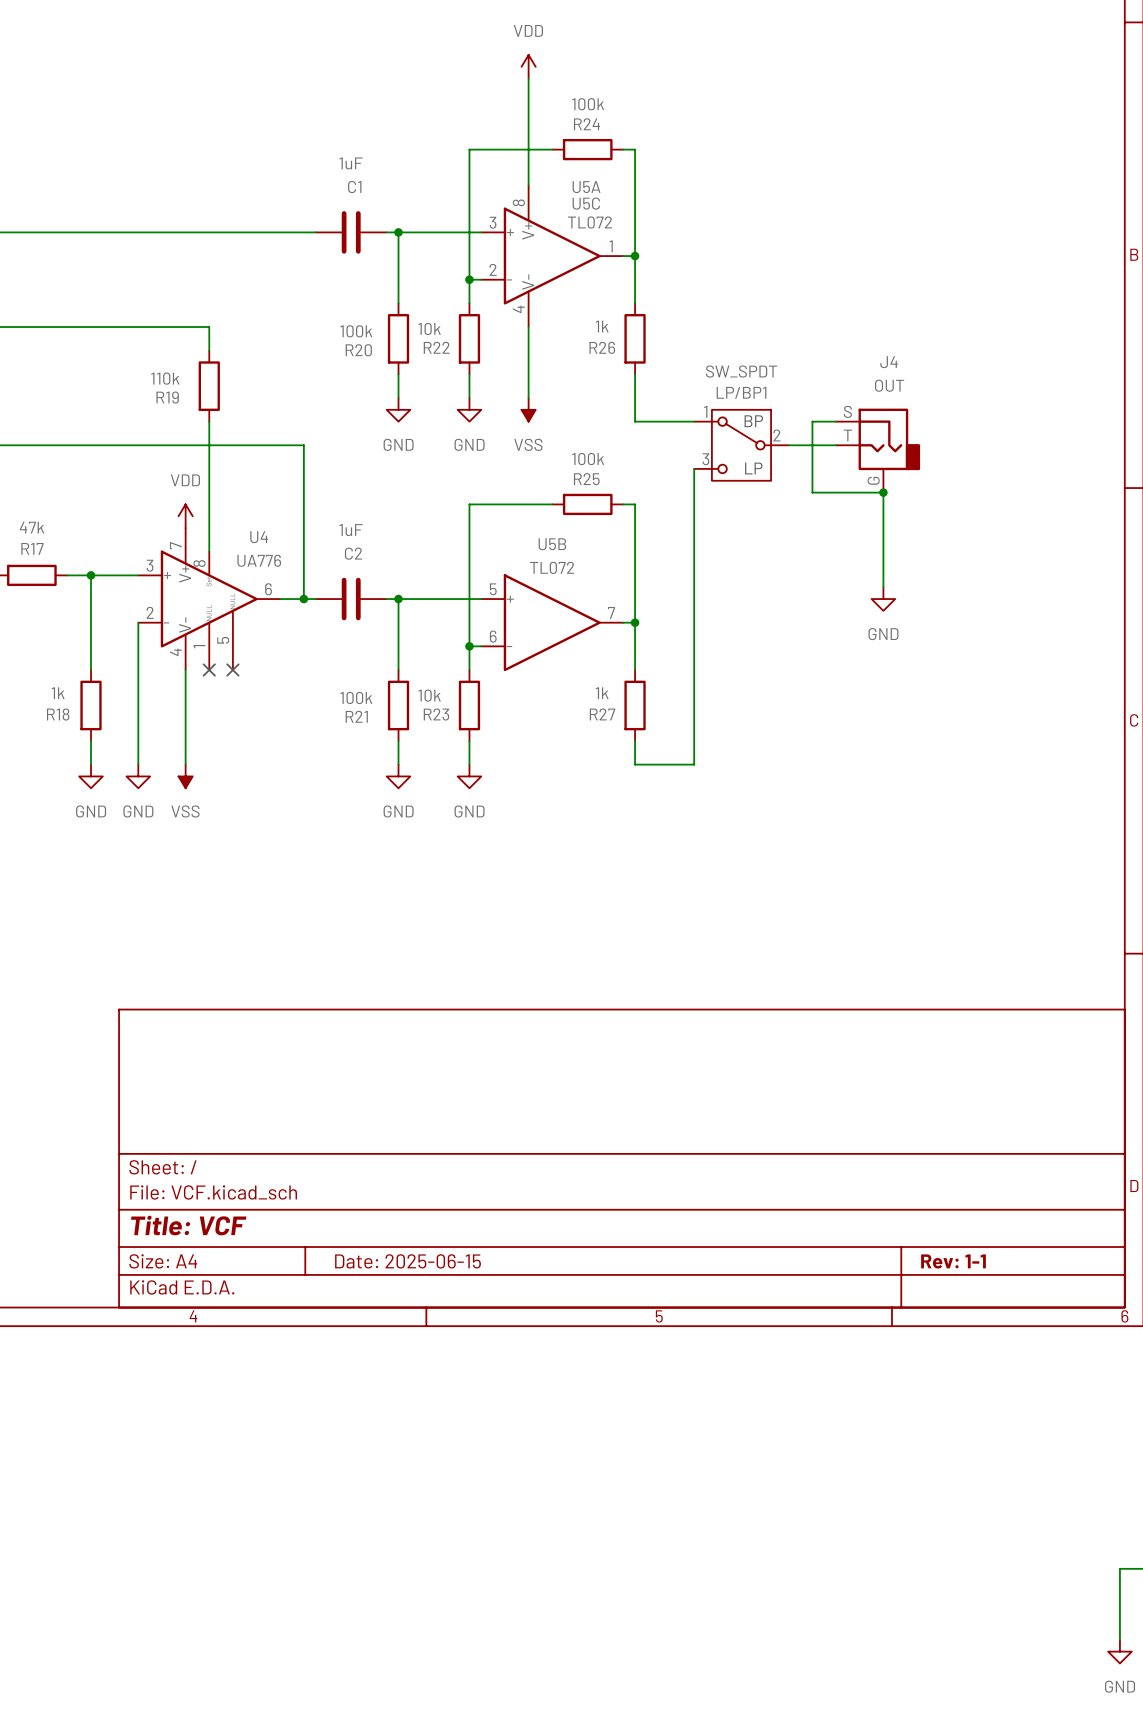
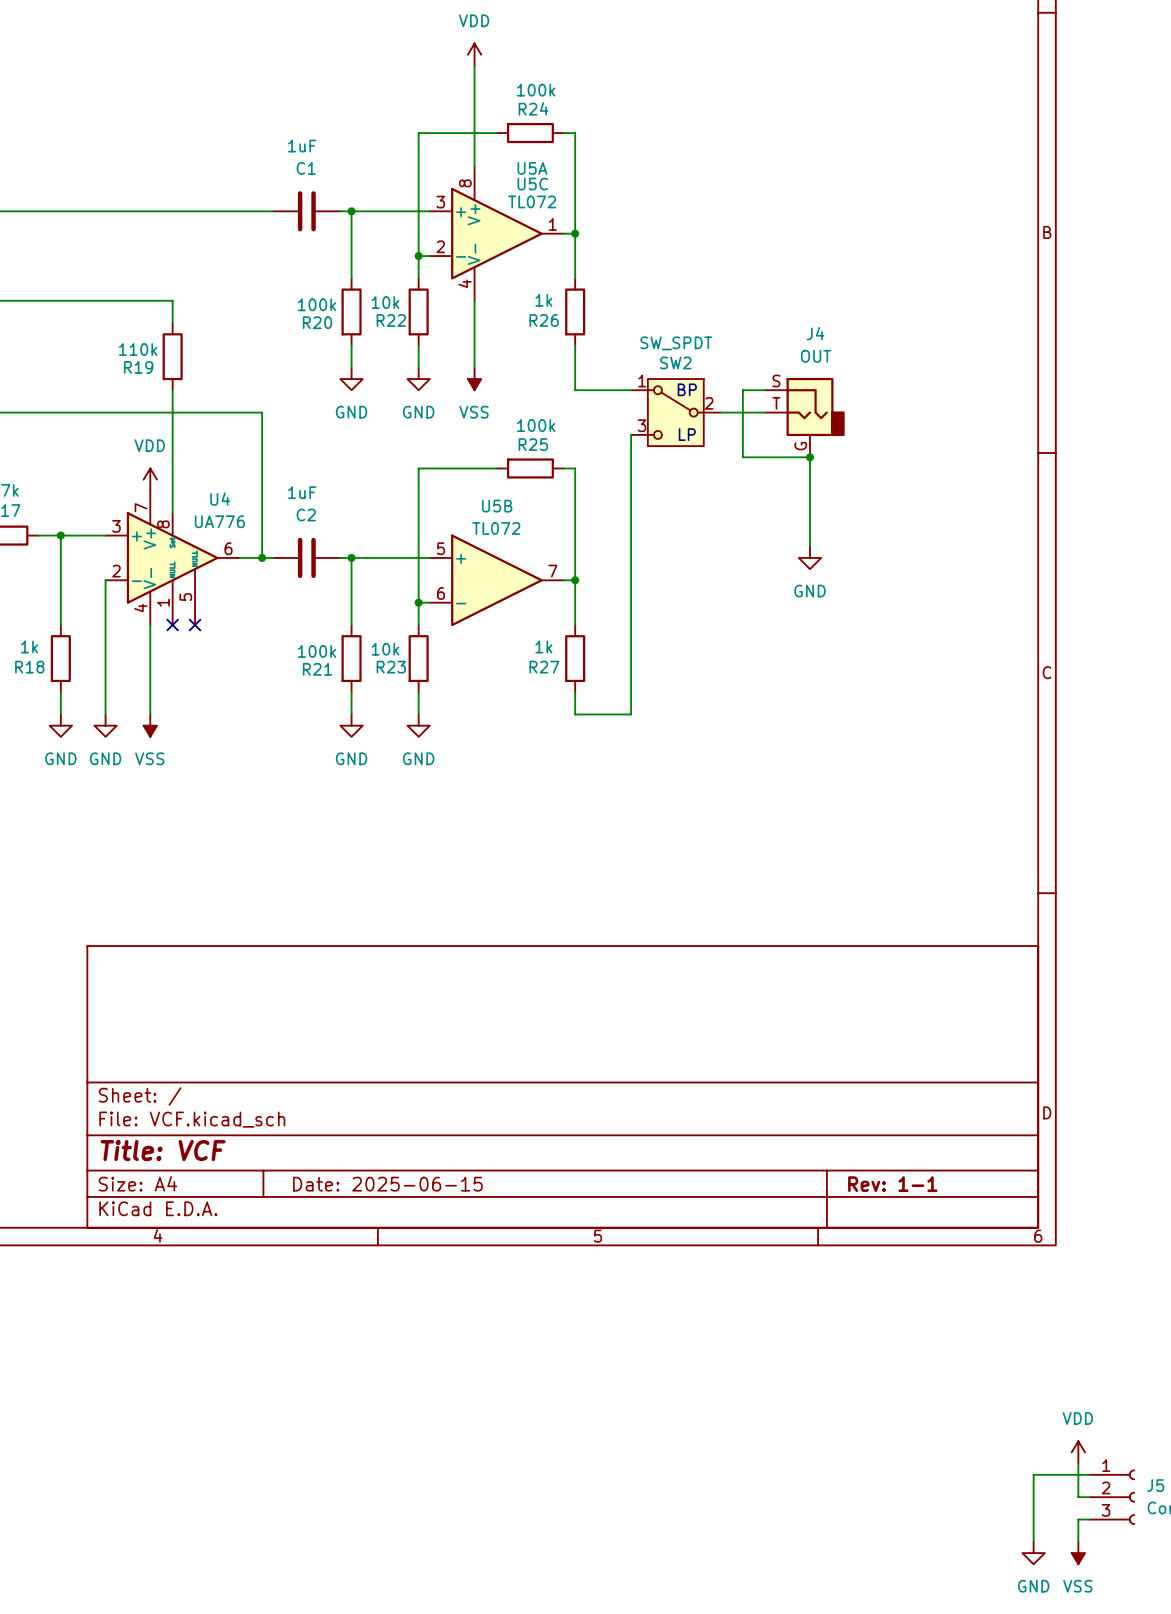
LP/BP1 name: LP/BP1 (741, 392) -> SW2 (675, 362)

